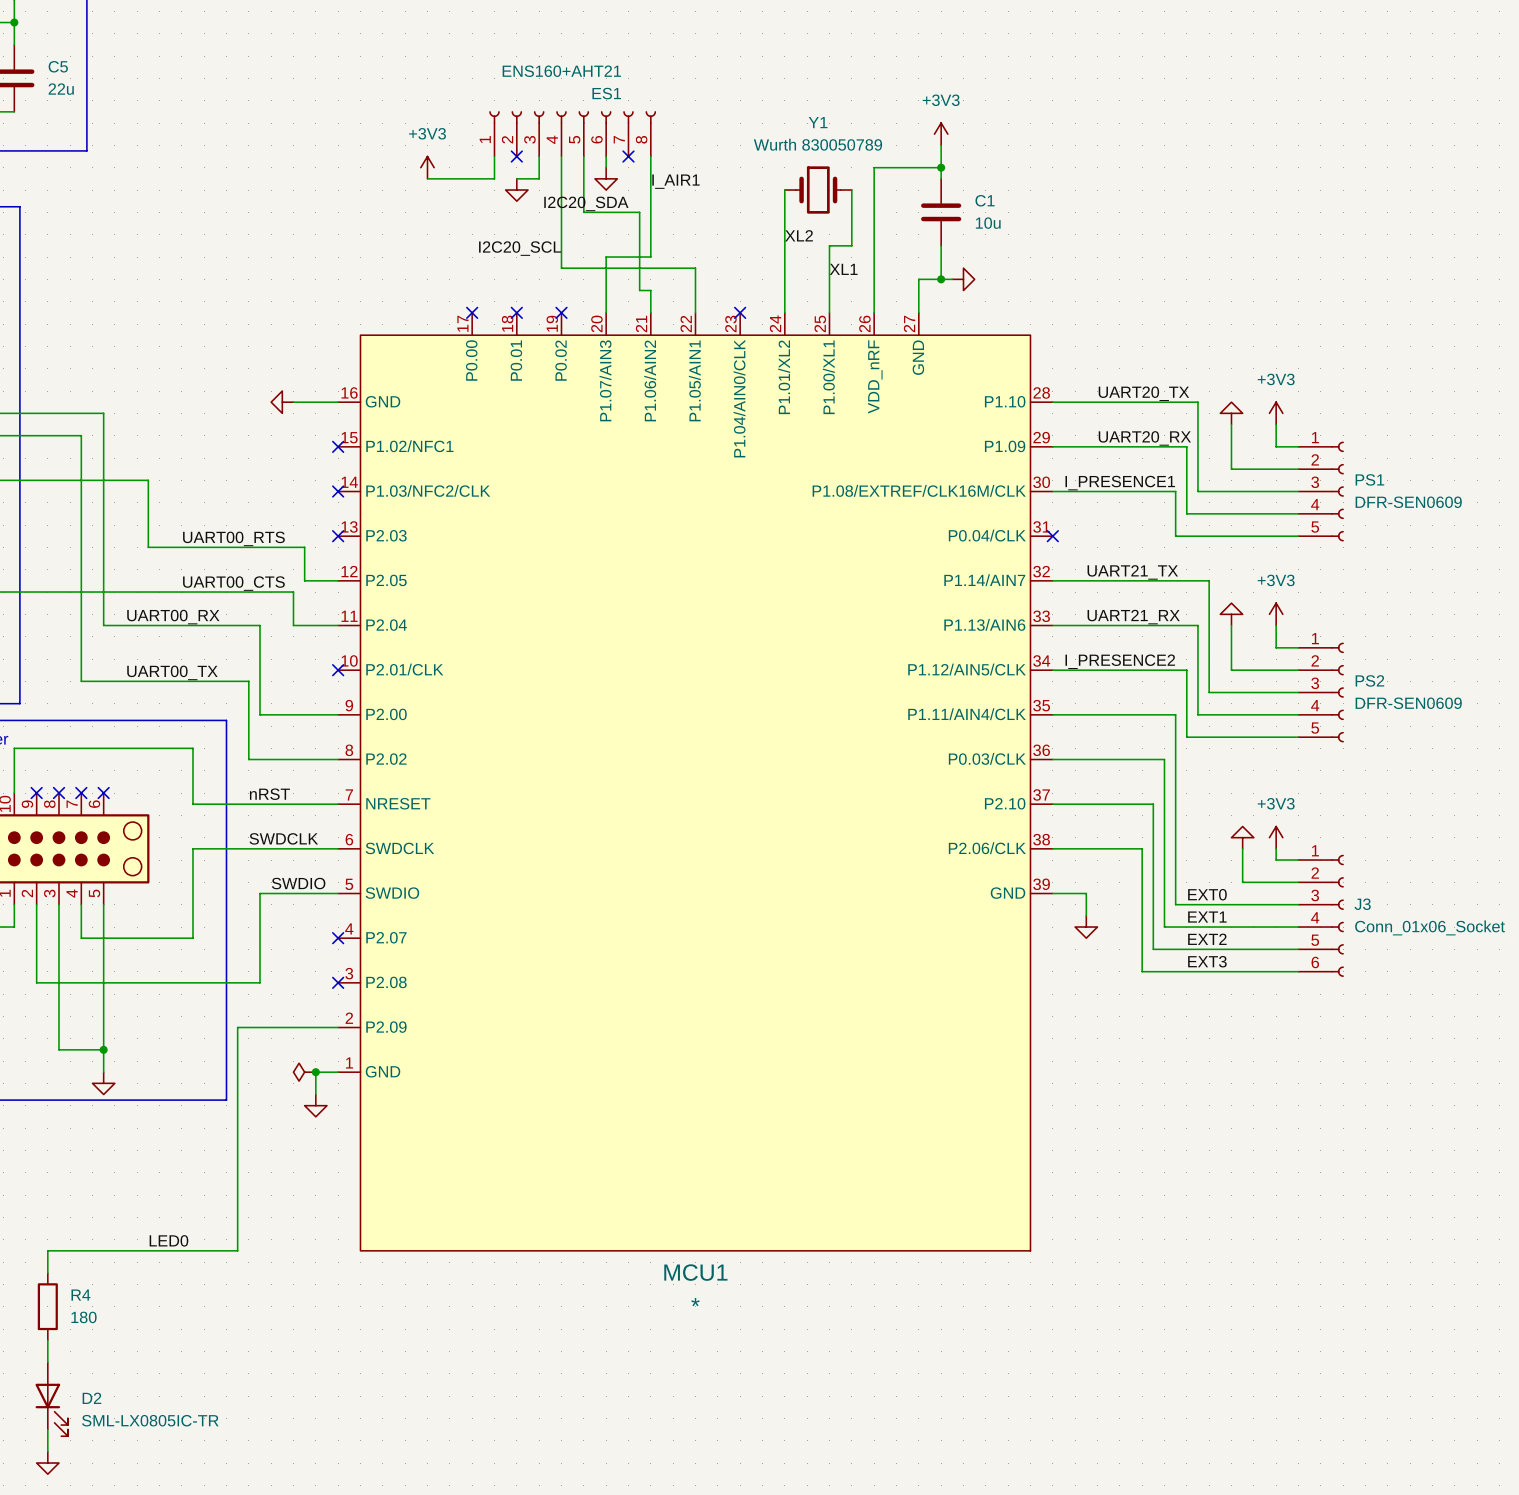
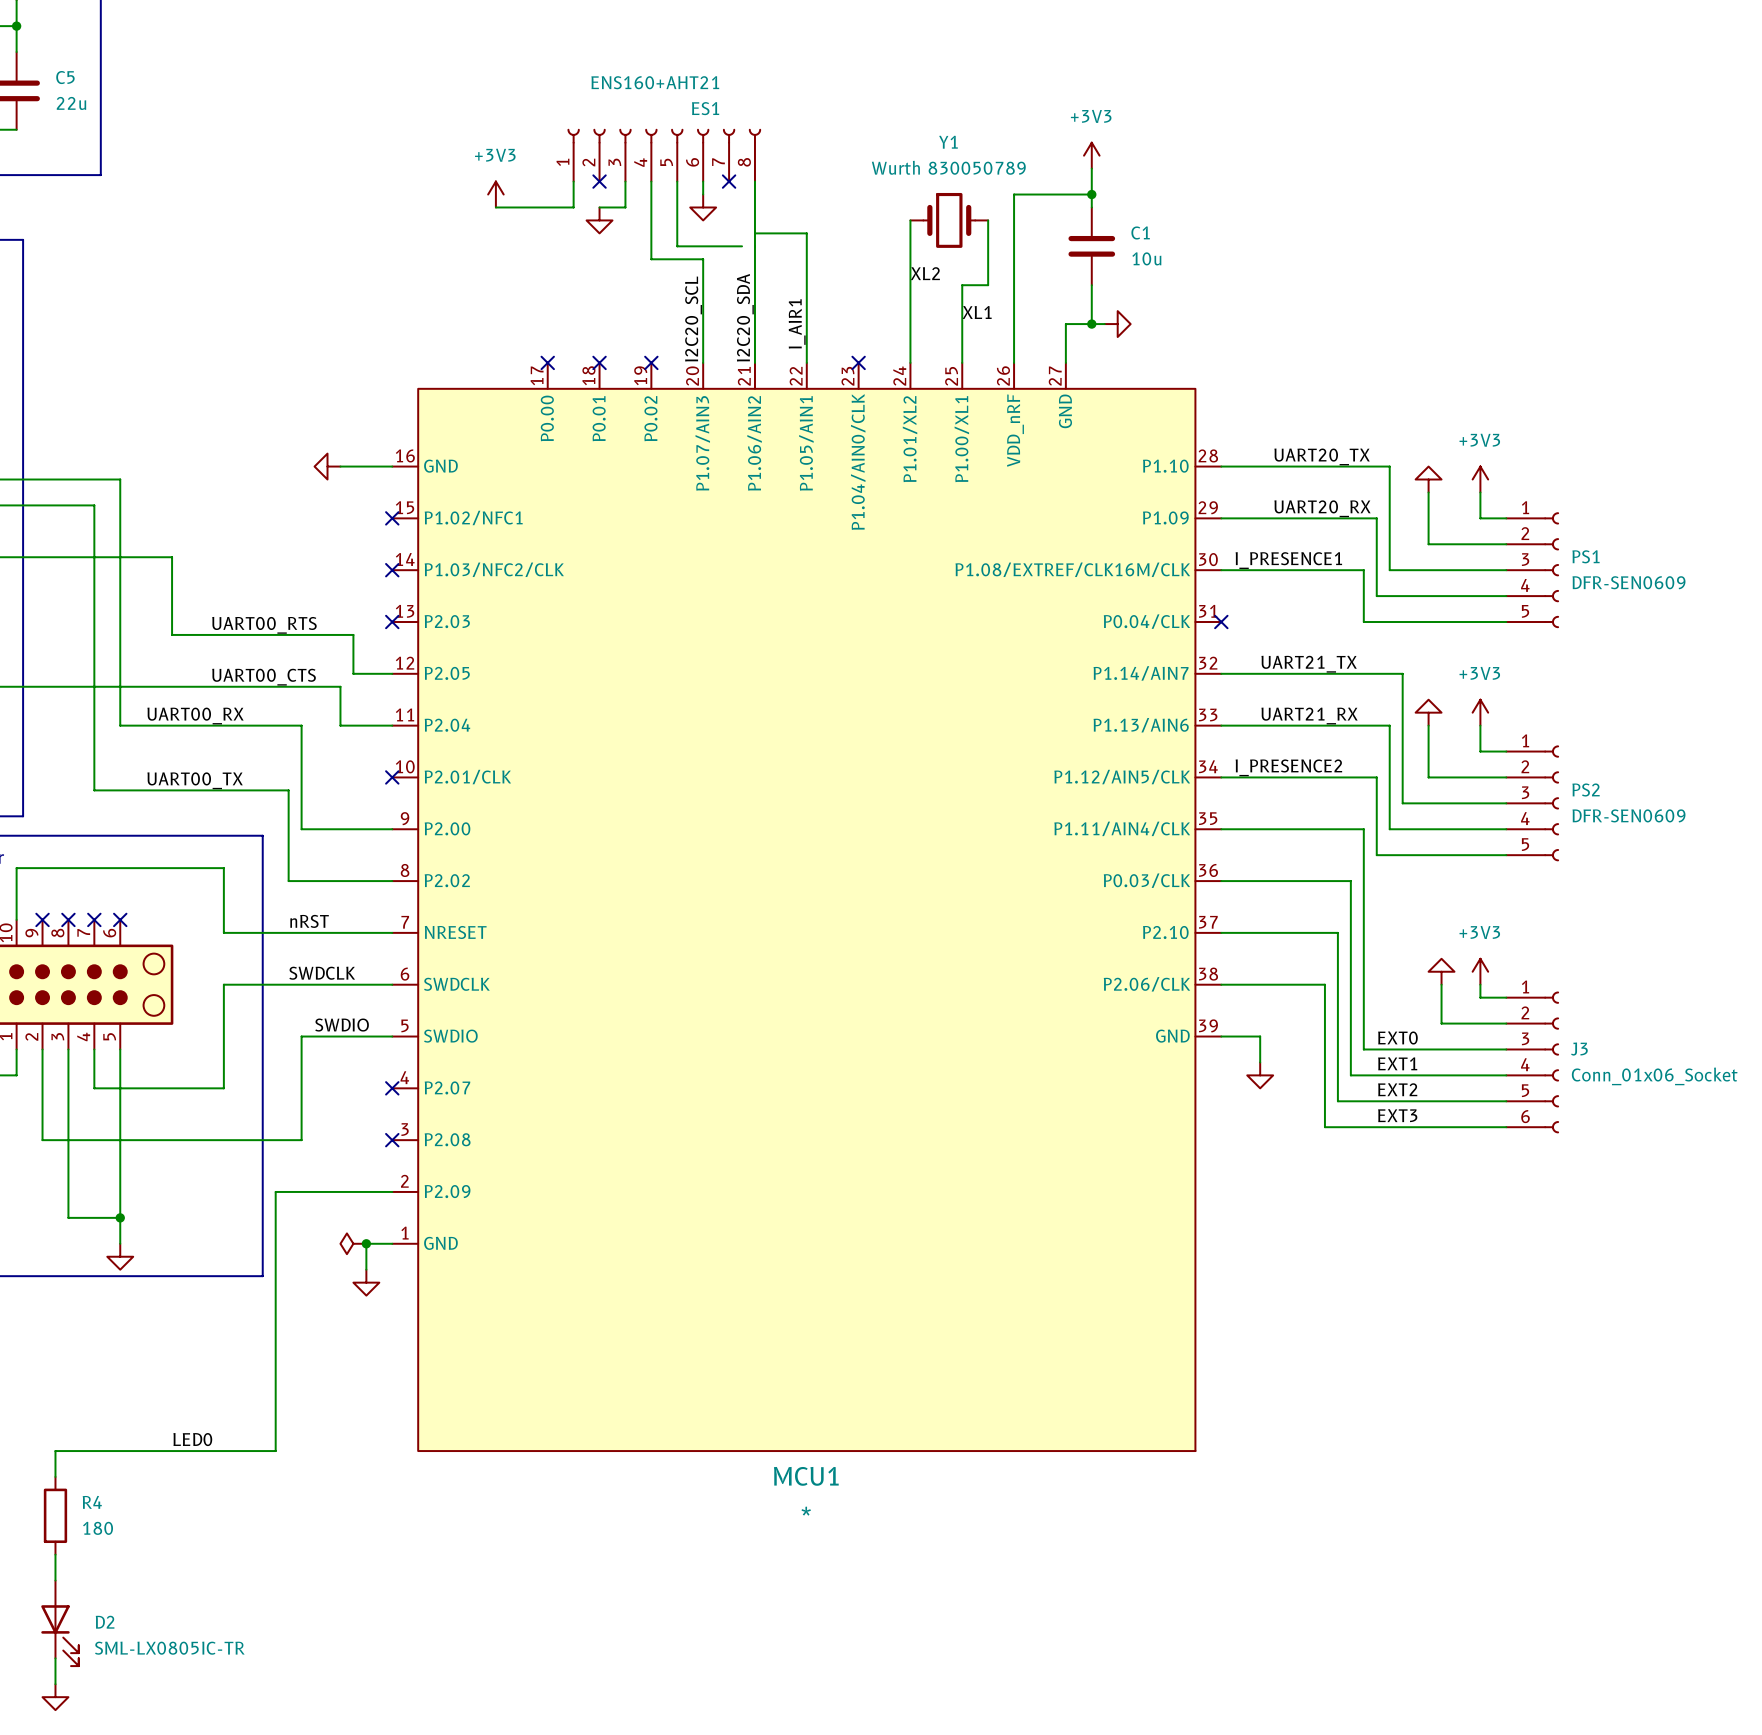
label rotation: 0° (675, 181) -> 90° counterclockwise (797, 323)
label position: I_AIR1 (675, 181) -> I_AIR1 (797, 323)
wire: none -> (754, 233) (806, 233) (806, 311)
label rotation: 0° (586, 203) -> 90° counterclockwise (745, 317)
wire: (639, 212) (639, 290) (650, 290) -> (754, 298) (754, 337)
wire: (561, 223) (561, 268) (695, 268) -> (651, 259) (703, 259) (703, 298)
label rotation: 0° (520, 248) -> 90° counterclockwise (693, 319)
wire: (606, 257) (650, 257) -> none

